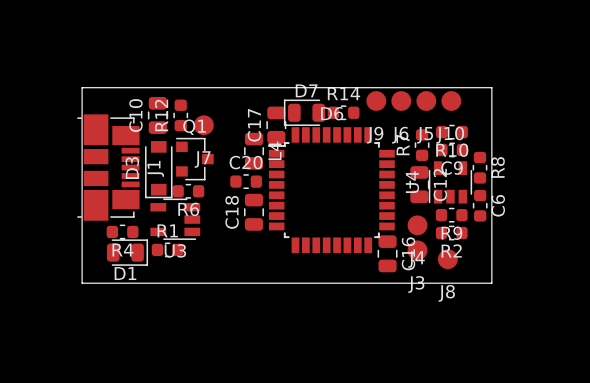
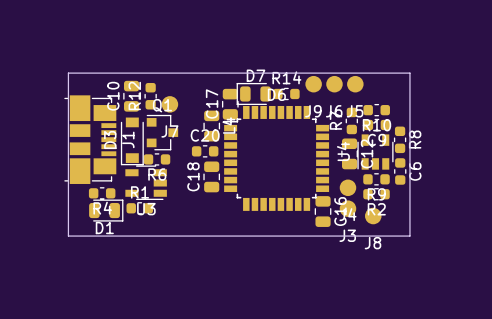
J10: (451, 101) -> none

